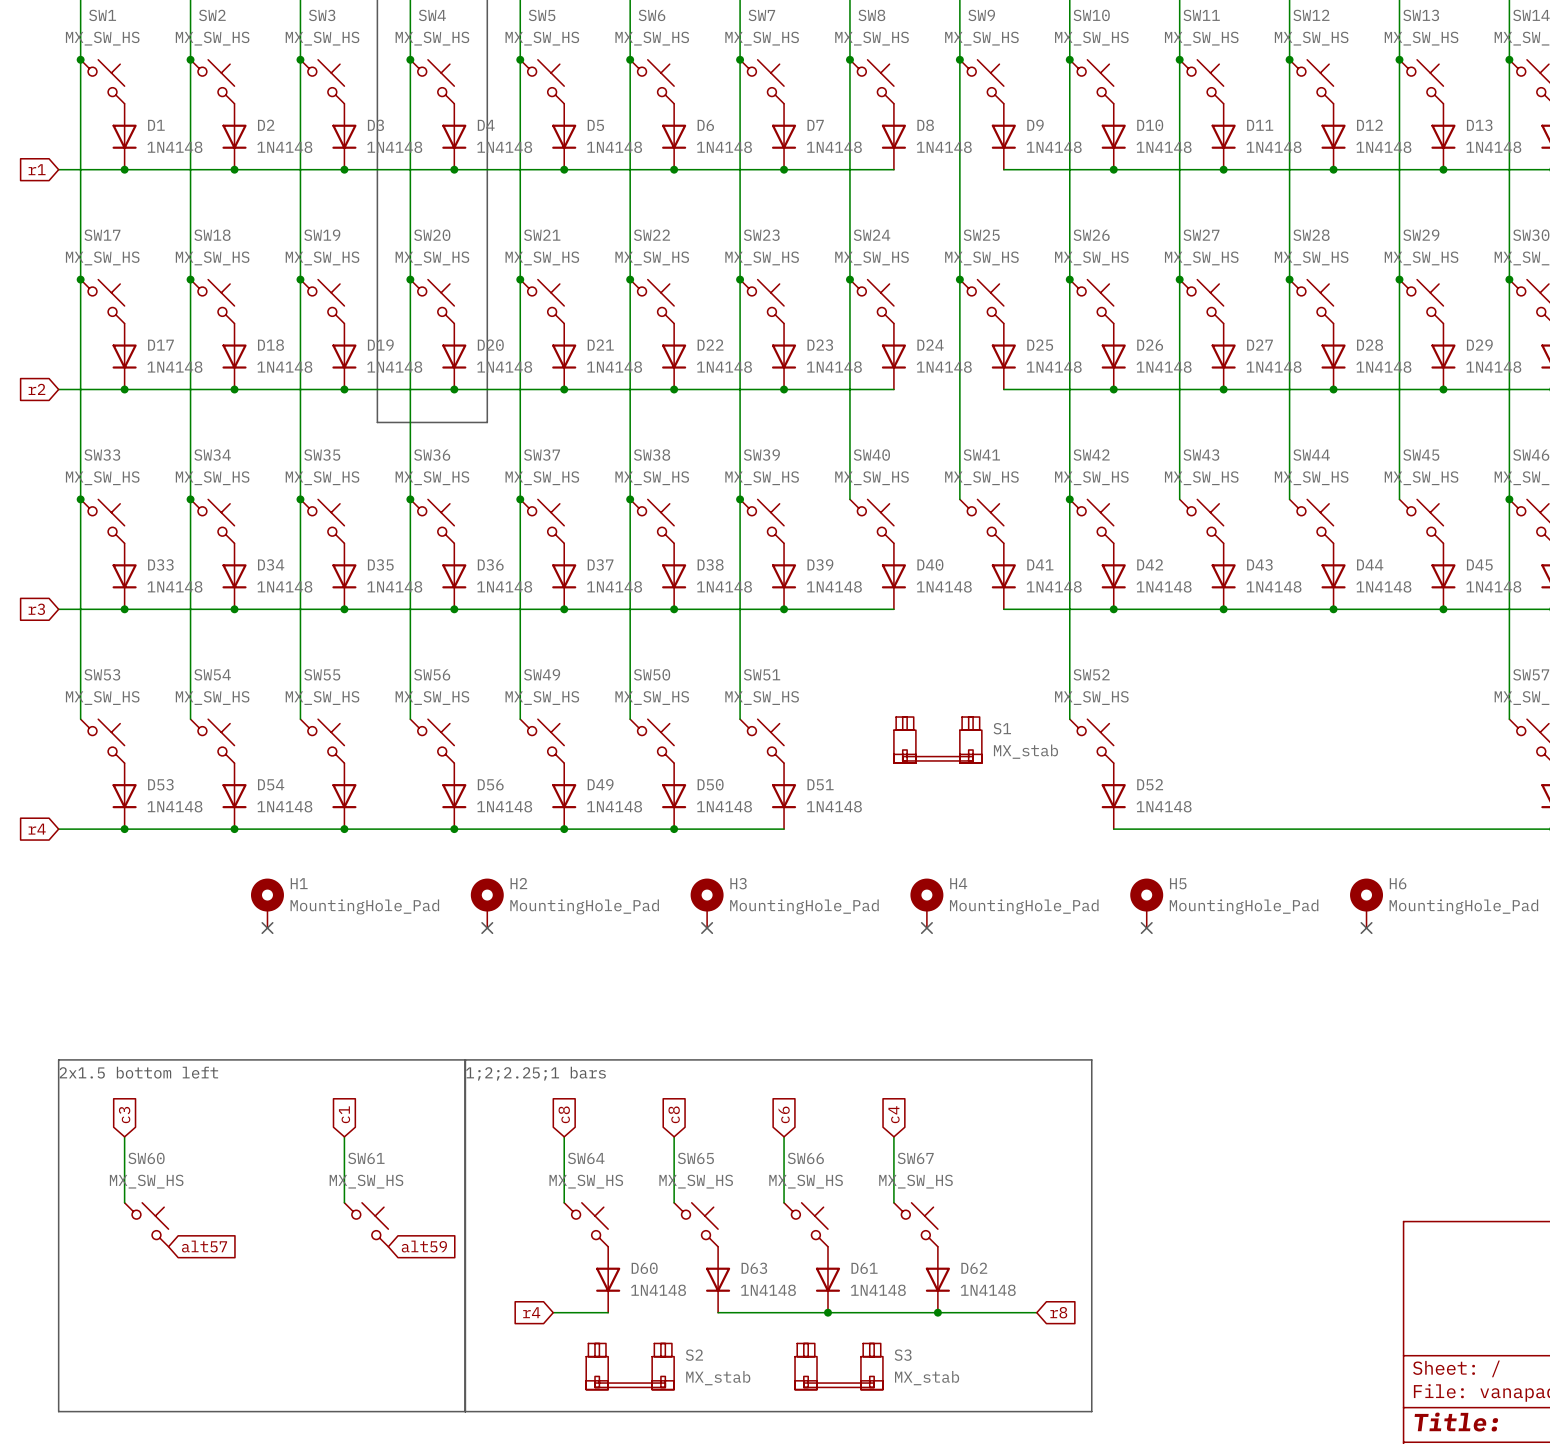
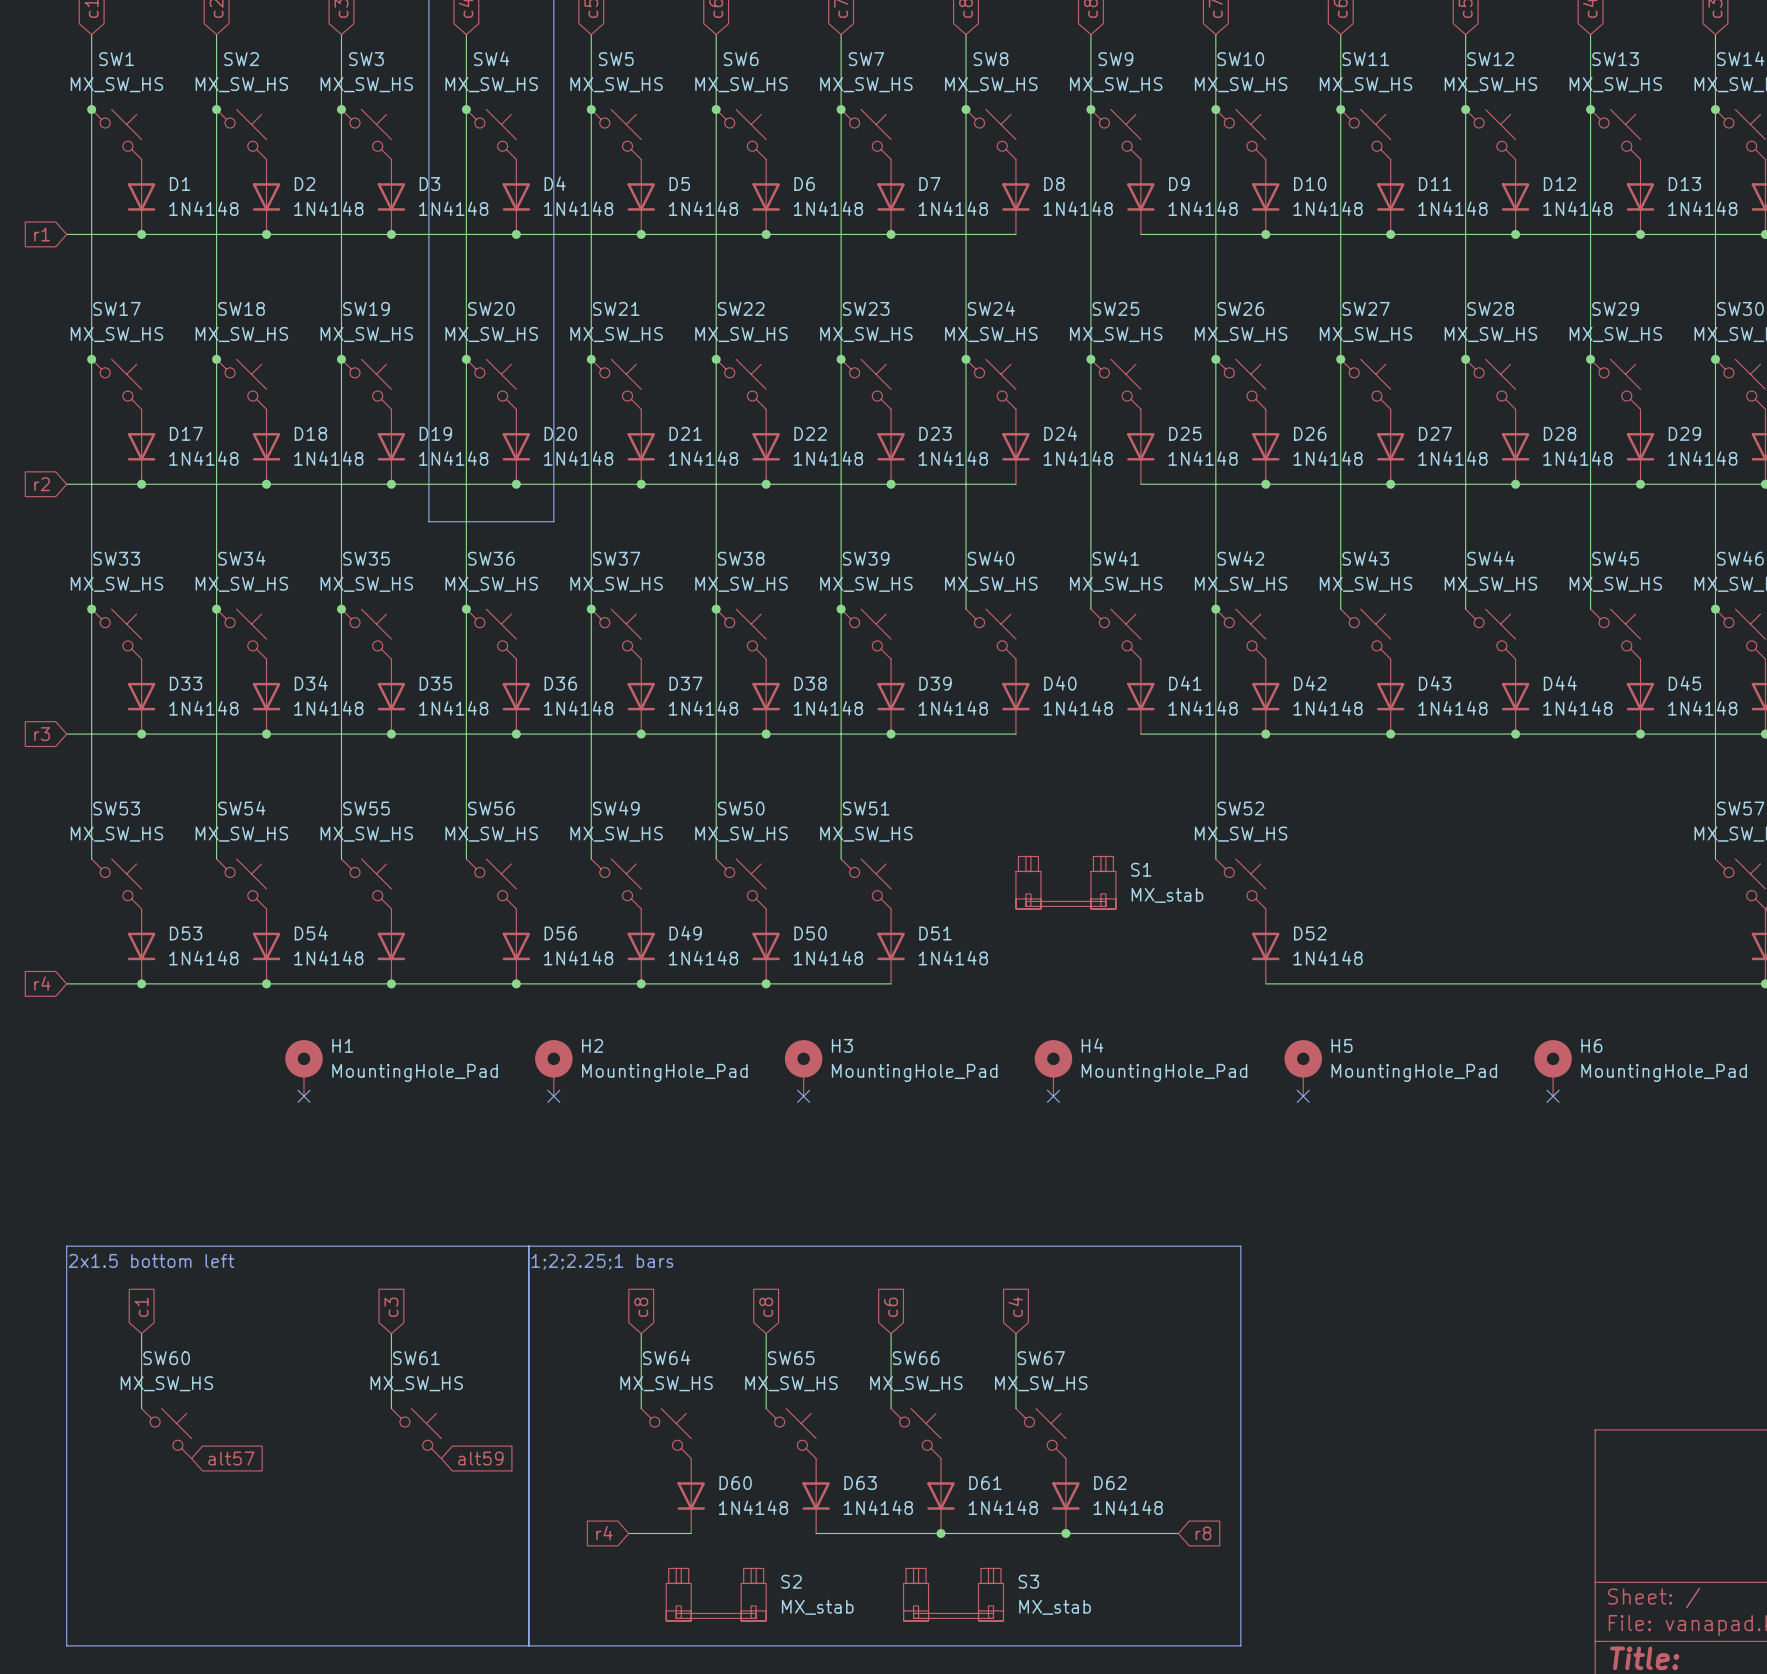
global label: c1 (344, 1114) -> c3 (391, 1307)
global label: c3 (124, 1115) -> c1 (141, 1307)

